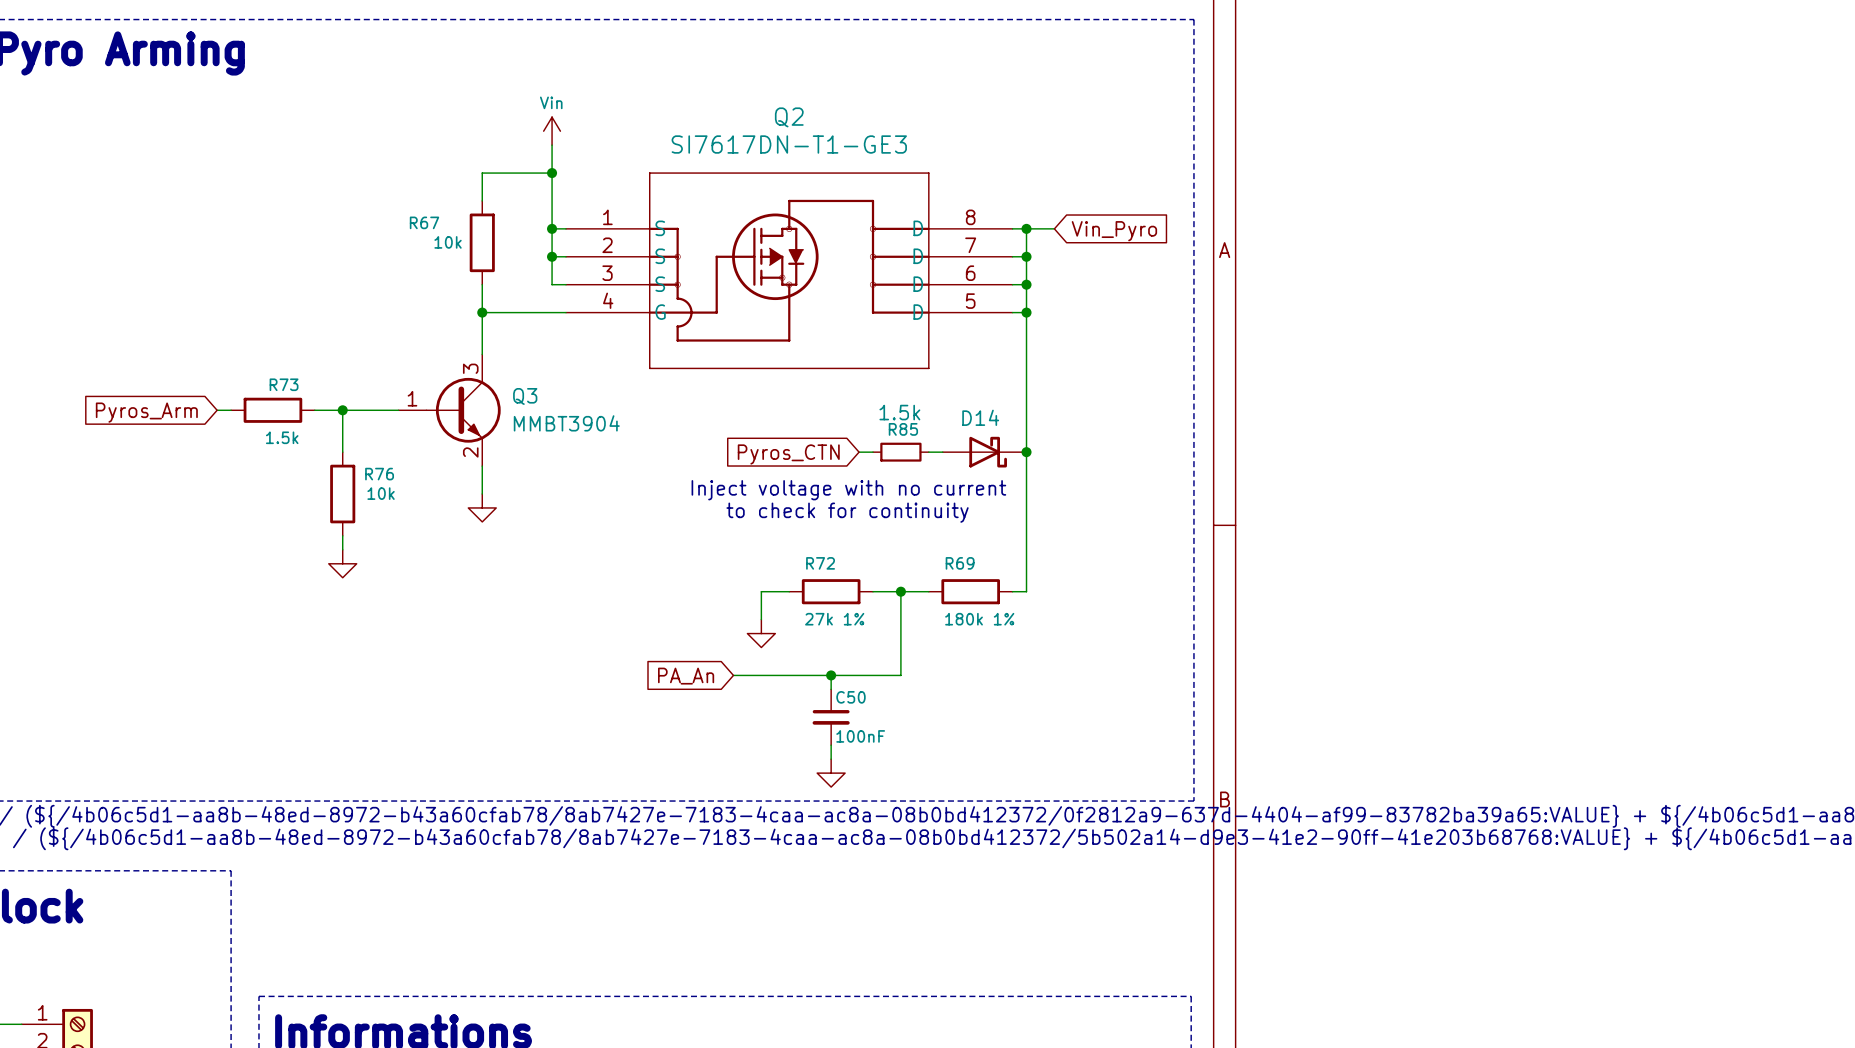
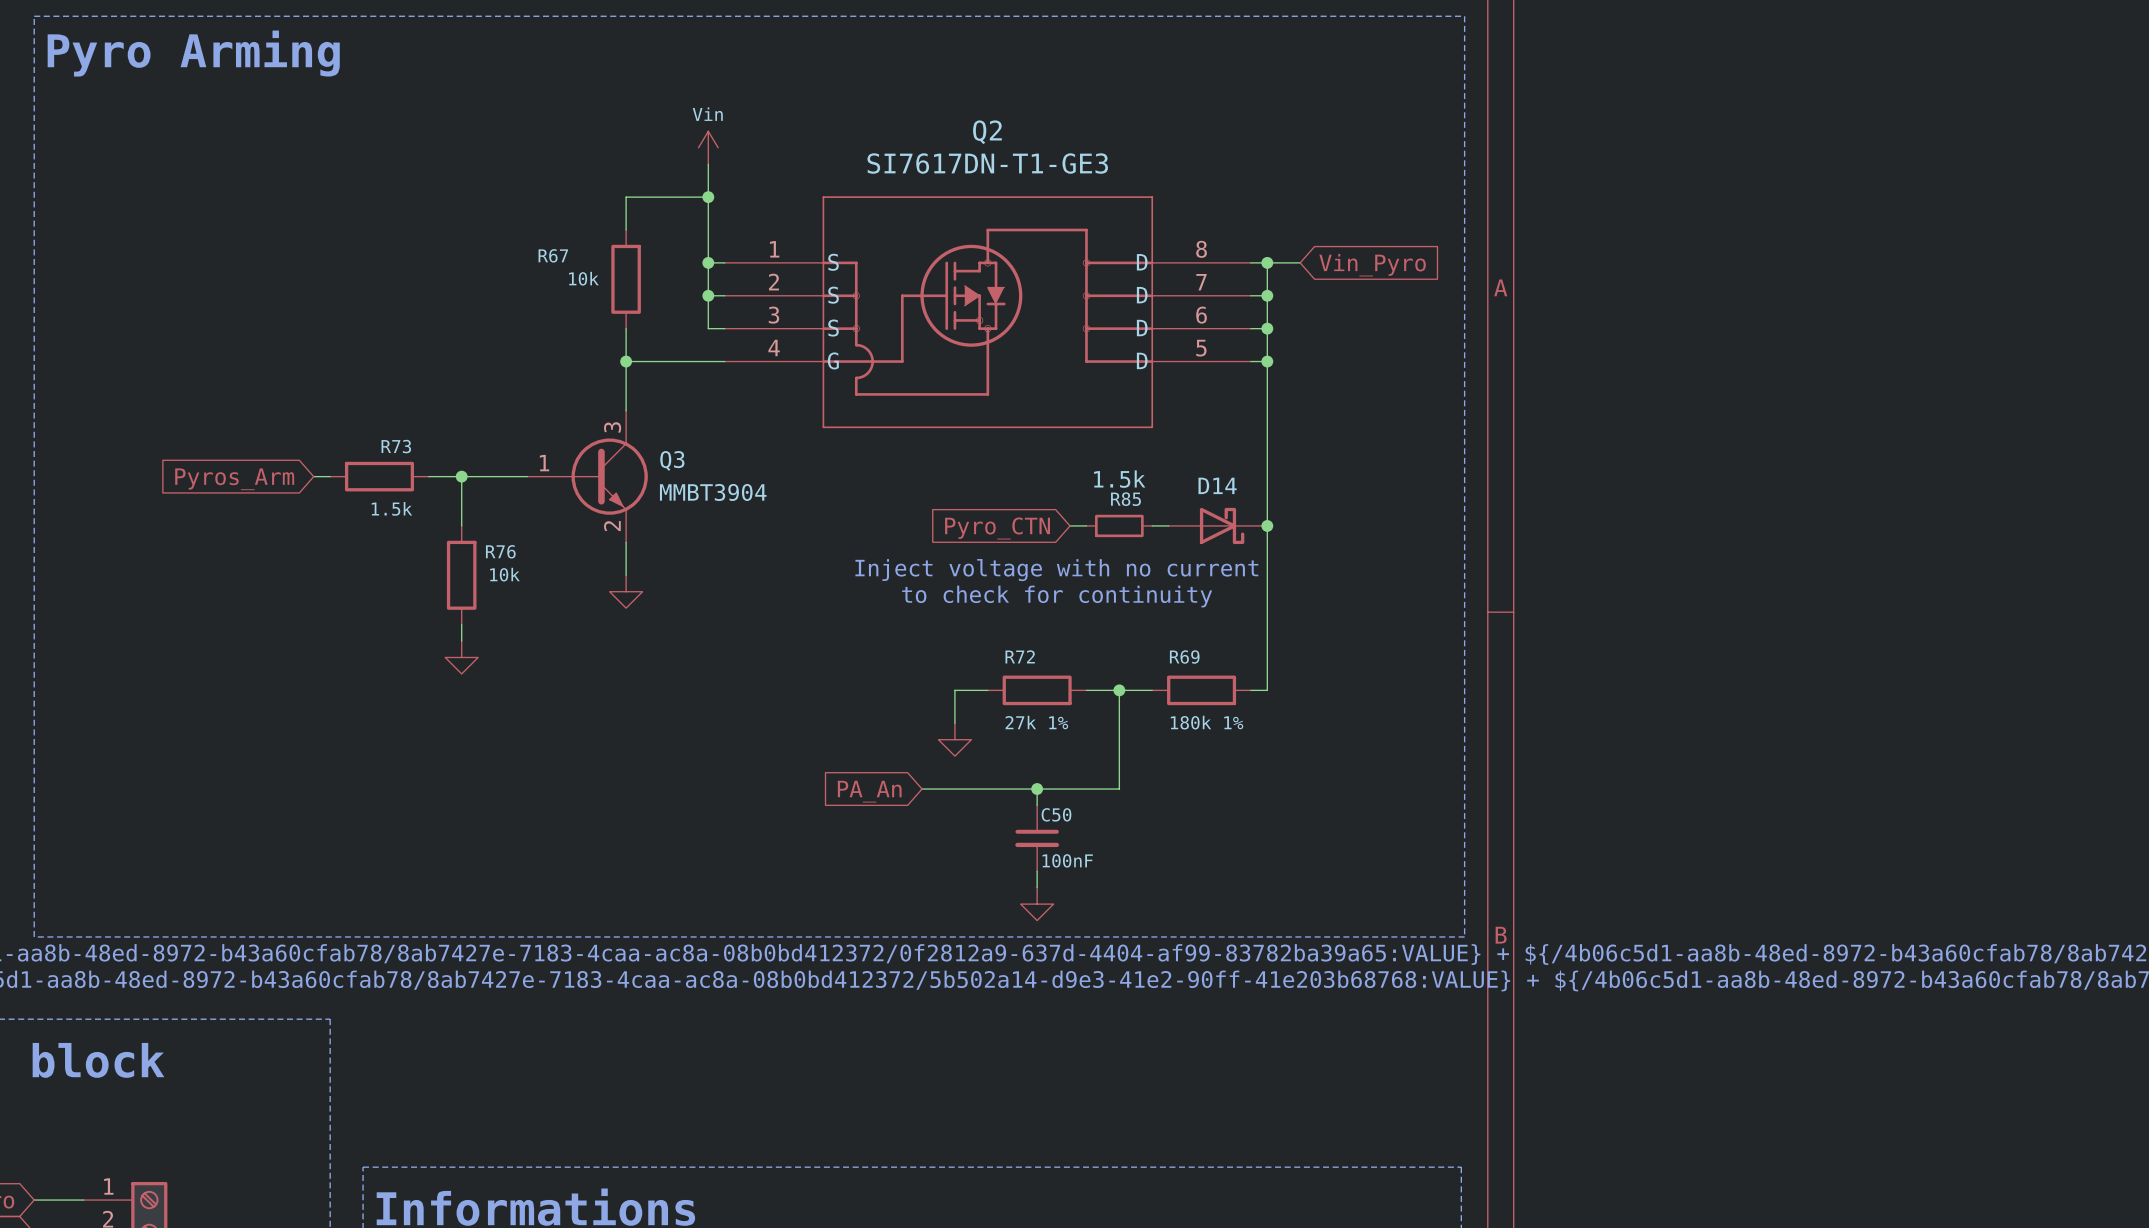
global label: Pyros_CTN (788, 454) -> Pyro_CTN (997, 528)

